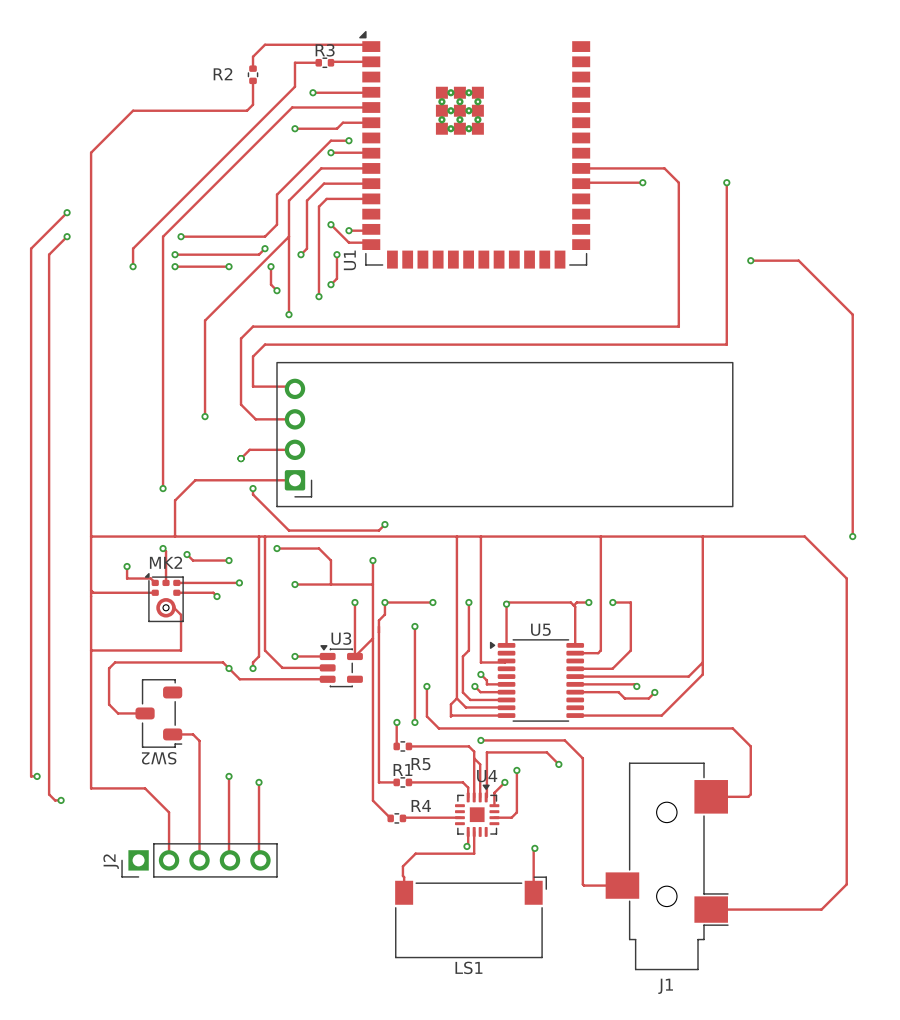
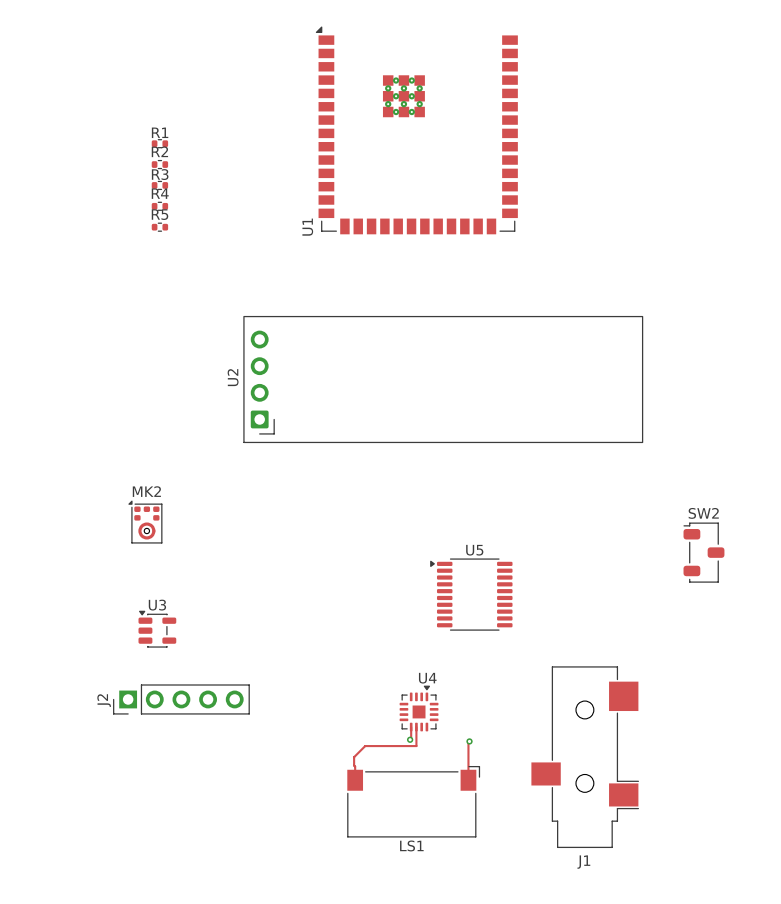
track: (366, 44) (265, 44) (253, 56) (253, 68) -> none
track: (331, 61) (371, 61) -> none
track: (318, 62) (294, 62) (294, 86) (133, 248) (133, 266) -> none
R3 position: (324, 62) -> (159, 185)
R2 rotation: 0° (253, 74) -> 90° clockwise (159, 164)
R2 position: (253, 74) -> (159, 164)
track: (253, 80) (253, 104) (247, 110) (133, 110) (91, 152) (91, 788) (145, 788) (169, 812) (169, 860) -> none
via: (312, 92) -> none
track: (371, 92) (312, 92) -> none
track: (371, 107) (292, 107) (163, 236) (163, 488) -> none
track: (371, 122) (342, 122) (336, 128) (294, 128) -> none
via: (294, 128) -> none
track: (348, 140) (330, 140) (277, 194) (277, 224) (265, 236) (181, 236) -> none
via: (348, 140) -> none
track: (330, 152) (371, 153) -> none
via: (330, 152) -> none
track: (371, 168) (321, 168) (288, 200) (288, 314) -> none
track: (581, 168) (664, 168) (678, 182) (678, 326) (253, 326) (241, 338) (241, 404) (255, 419) (294, 419) -> none
track: (642, 182) (581, 183) -> none
via: (642, 182) -> none
track: (726, 182) (726, 344) (265, 344) (253, 356) (253, 386) (292, 386) (294, 388) -> none
via: (726, 182) -> none
track: (371, 183) (324, 183) (306, 200) (306, 248) (300, 254) -> none
track: (371, 198) (326, 198) (318, 206) (318, 296) -> none
track: (67, 212) (31, 248) (31, 776) (37, 776) -> none
via: (67, 212) -> none
track: (330, 224) (348, 242) (369, 242) (371, 244) -> none
via: (330, 224) -> none
track: (371, 229) (348, 230) -> none
via: (348, 230) -> none
track: (67, 236) (49, 254) (49, 794) (55, 800) (61, 800) -> none
via: (67, 236) -> none
via: (181, 236) -> none
track: (288, 236) (205, 320) (205, 416) -> none
track: (265, 248) (259, 254) (175, 254) -> none
via: (265, 248) -> none
via: (175, 254) -> none
via: (300, 254) -> none
track: (336, 254) (336, 278) (330, 284) -> none
via: (336, 254) -> none
track: (750, 260) (798, 260) (852, 314) (852, 536) -> none
via: (750, 260) -> none
via: (133, 266) -> none
track: (175, 266) (229, 266) -> none
via: (175, 266) -> none
via: (229, 266) -> none
track: (271, 266) (271, 284) (277, 290) -> none
via: (271, 266) -> none
via: (330, 284) -> none
via: (277, 290) -> none
via: (318, 296) -> none
via: (288, 314) -> none
via: (205, 416) -> none
U2 name: none -> U2 (233, 377)
track: (294, 449) (249, 449) (241, 458) -> none
via: (241, 458) -> none
track: (294, 480) (195, 480) (175, 500) (175, 536) -> none
via: (163, 488) -> none
track: (253, 488) (253, 494) (288, 530) (378, 530) (384, 524) -> none
via: (253, 488) -> none
via: (384, 524) -> none
track: (91, 536) (804, 536) (846, 578) (846, 884) (821, 909) (711, 909) -> none
track: (259, 536) (259, 656) (253, 662) (253, 668) -> none
track: (265, 536) (265, 650) (282, 667) (327, 667) -> none
track: (456, 536) (456, 698) -> none
track: (480, 536) (480, 662) (506, 660) -> none
track: (600, 536) (600, 650) (598, 653) (575, 653) -> none
track: (702, 536) (702, 674) (661, 715) (575, 715) -> none
via: (852, 536) -> none
track: (163, 548) (166, 551) (166, 582) -> none
via: (163, 548) -> none
track: (277, 548) (318, 548) (330, 560) (330, 584) -> none
via: (277, 548) -> none
track: (187, 554) (193, 560) (229, 560) -> none
via: (187, 554) -> none
via: (229, 560) -> none
track: (372, 560) (372, 800) (390, 818) -> none
via: (372, 560) -> none
track: (127, 566) (127, 578) (150, 578) (155, 582) -> none
via: (127, 566) -> none
track: (176, 582) (239, 582) (241, 584) -> none
via: (239, 582) -> none
track: (294, 584) (372, 584) -> none
via: (294, 584) -> none
track: (91, 590) (93, 592) (155, 592) -> none
track: (176, 592) (213, 592) (217, 596) -> none
via: (217, 596) -> none
track: (354, 602) (354, 656) (372, 638) -> none
via: (354, 602) -> none
via: (384, 602) -> none
track: (432, 602) (384, 602) (384, 614) (378, 620) (378, 782) (396, 782) -> none
via: (432, 602) -> none
track: (468, 602) (468, 650) (462, 656) (462, 692) (470, 699) (506, 699) -> none
via: (468, 602) -> none
track: (588, 602) (576, 602) (573, 605) -> none
via: (588, 602) -> none
track: (612, 602) (630, 602) (630, 650) (612, 668) (575, 668) -> none
via: (612, 602) -> none
track: (506, 604) (506, 645) -> none
track: (506, 604) (508, 602) (570, 602) (575, 606) (575, 645) -> none
via: (506, 604) -> none
track: (173, 607) (181, 614) (181, 650) (91, 650) -> none
track: (414, 626) (414, 722) -> none
via: (414, 626) -> none
track: (294, 656) (327, 656) -> none
via: (294, 656) -> none
track: (702, 662) (688, 676) (575, 676) -> none
U3 position: (341, 666) -> (157, 629)
via: (229, 668) -> none
via: (253, 668) -> none
track: (480, 674) (486, 680) (486, 684) (506, 684) -> none
via: (480, 674) -> none
track: (327, 679) (239, 679) (223, 662) (115, 662) (109, 668) (109, 704) (118, 713) (145, 713) -> none
track: (575, 684) (634, 684) (636, 686) -> none
track: (426, 686) (426, 716) (438, 728) (732, 728) (750, 746) (750, 794) (748, 796) (711, 796) -> none
via: (426, 686) -> none
track: (474, 686) (480, 692) (506, 692) -> none
via: (474, 686) -> none
via: (636, 686) -> none
track: (575, 692) (618, 692) (624, 698) (648, 698) (654, 692) -> none
via: (654, 692) -> none
track: (456, 698) (450, 704) (450, 716) (506, 715) -> none
track: (456, 698) (465, 707) (506, 707) -> none
SW2 rotation: 0° (158, 713) -> 180° (703, 552)
SW2 position: (158, 713) -> (703, 552)
track: (396, 722) (396, 746) -> none
via: (396, 722) -> none
via: (414, 722) -> none
track: (172, 734) (193, 734) (199, 740) (199, 860) -> none
track: (480, 740) (564, 740) (582, 758) (582, 884) (622, 885) -> none
via: (480, 740) -> none
R5 position: (402, 746) -> (159, 227)
track: (408, 746) (468, 746) (474, 751) (474, 797) -> none
track: (474, 758) (480, 764) (480, 797) -> none
R5 name position: R5 (421, 764) -> R5 (160, 214)
track: (558, 764) (546, 752) (486, 752) (486, 797) -> none
via: (558, 764) -> none
track: (516, 770) (516, 812) (511, 817) (494, 817) -> none
via: (516, 770) -> none
via: (37, 776) -> none
track: (229, 776) (229, 860) -> none
via: (229, 776) -> none
track: (259, 782) (260, 860) -> none
via: (259, 782) -> none
R1 position: (402, 782) -> (159, 143)
track: (408, 782) (462, 782) (468, 787) (468, 797) -> none
track: (504, 782) (494, 792) (494, 805) -> none
via: (504, 782) -> none
via: (61, 800) -> none
R4 name position: R4 (421, 805) -> R4 (160, 193)
track: (459, 817) (402, 818) -> none
R4 position: (396, 818) -> (159, 206)
J2 position: (199, 860) -> (181, 699)

